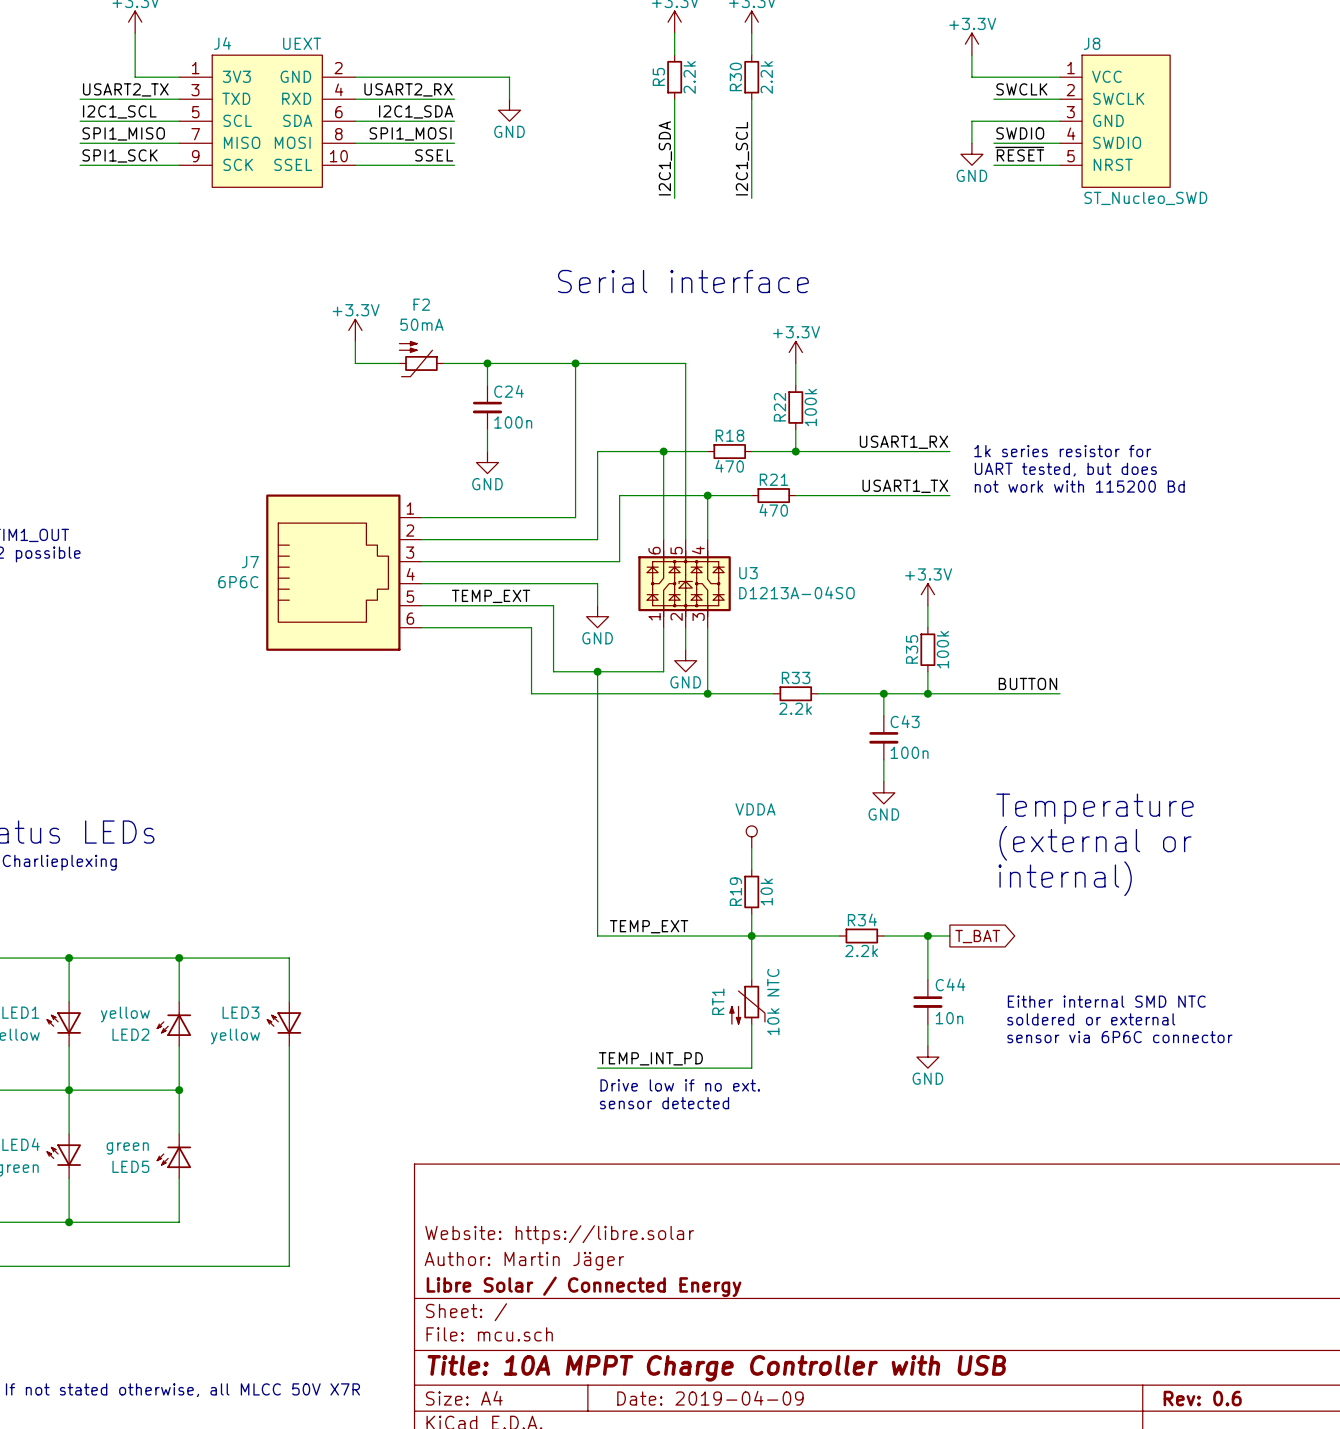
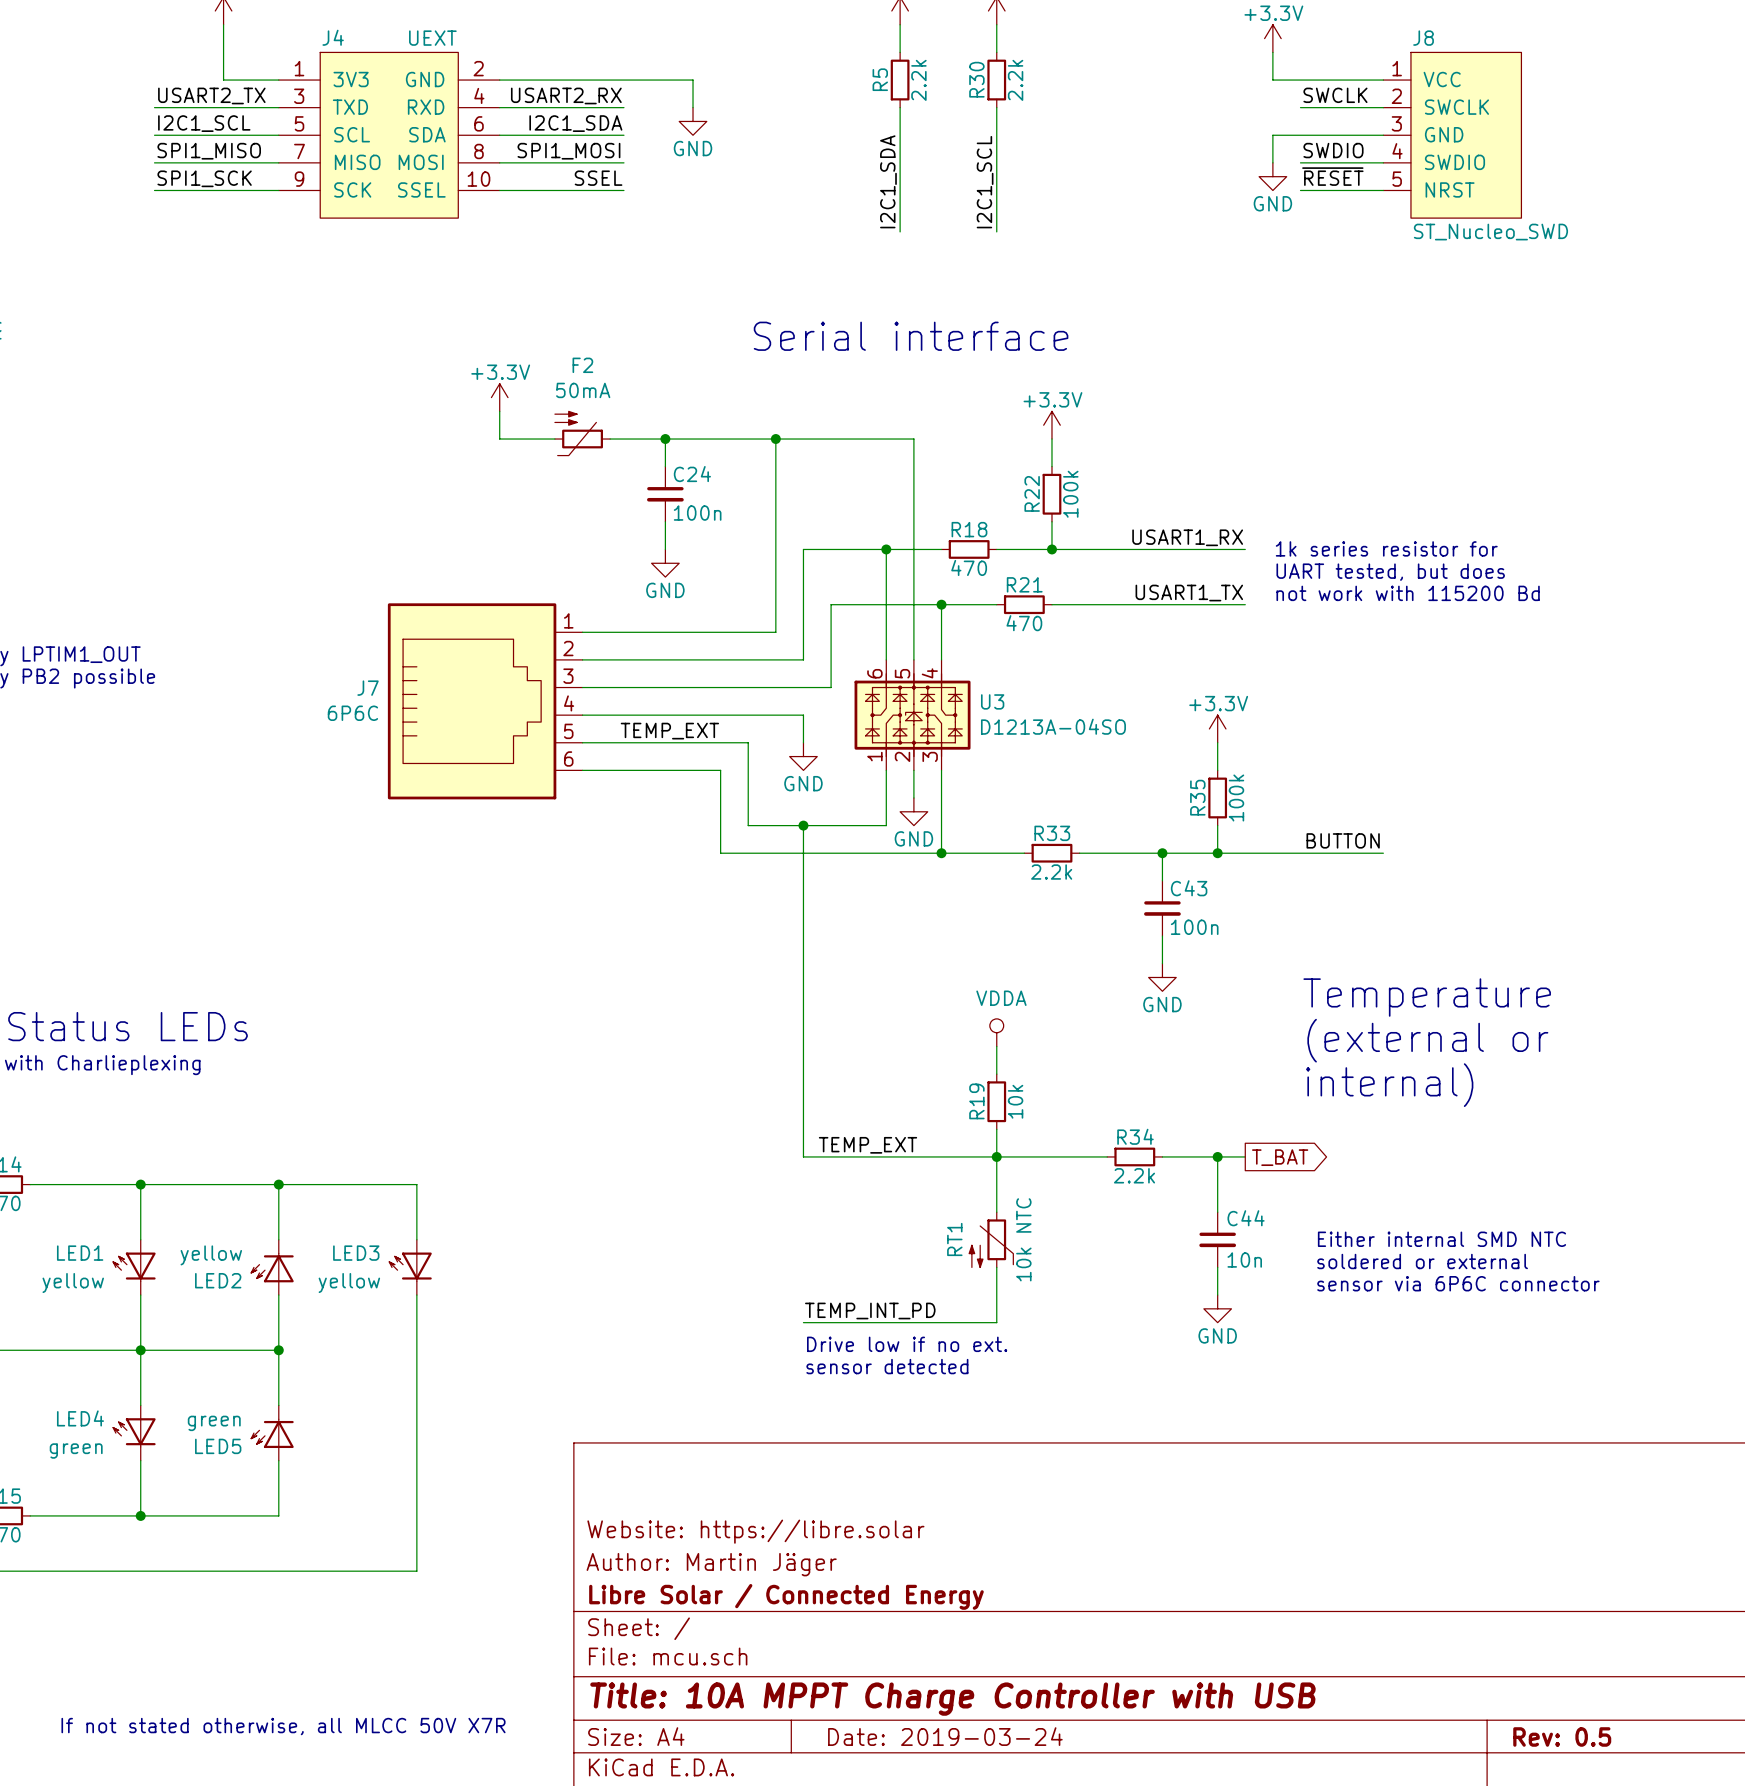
title block: Date: 2019-04-09 (710, 1398) -> Date: 2019-03-24 (945, 1736)
title block: Rev: 0.6 (1202, 1398) -> Rev: 0.5 (1562, 1736)

